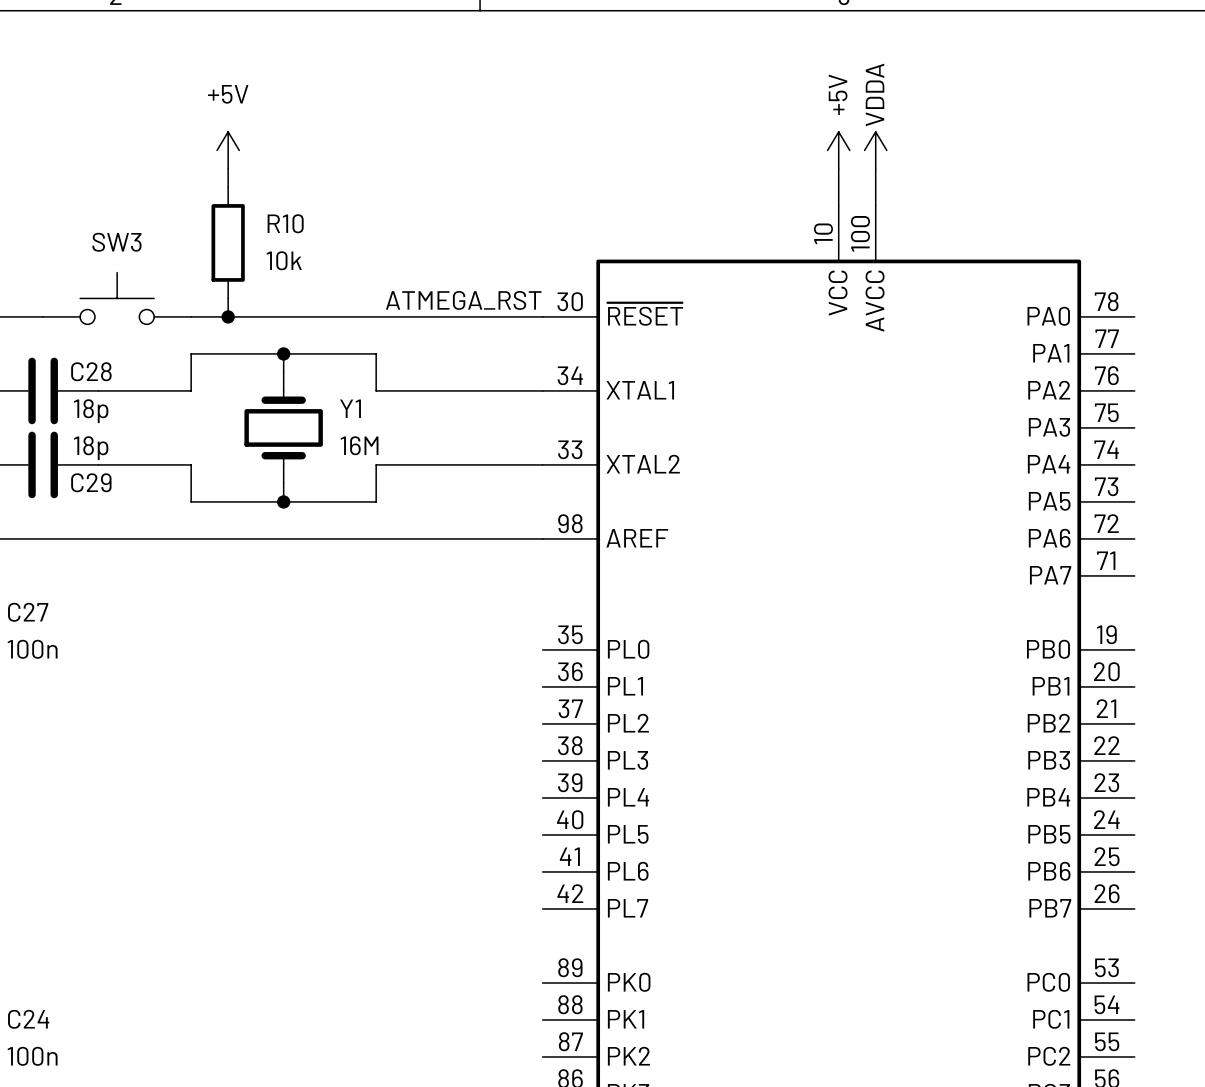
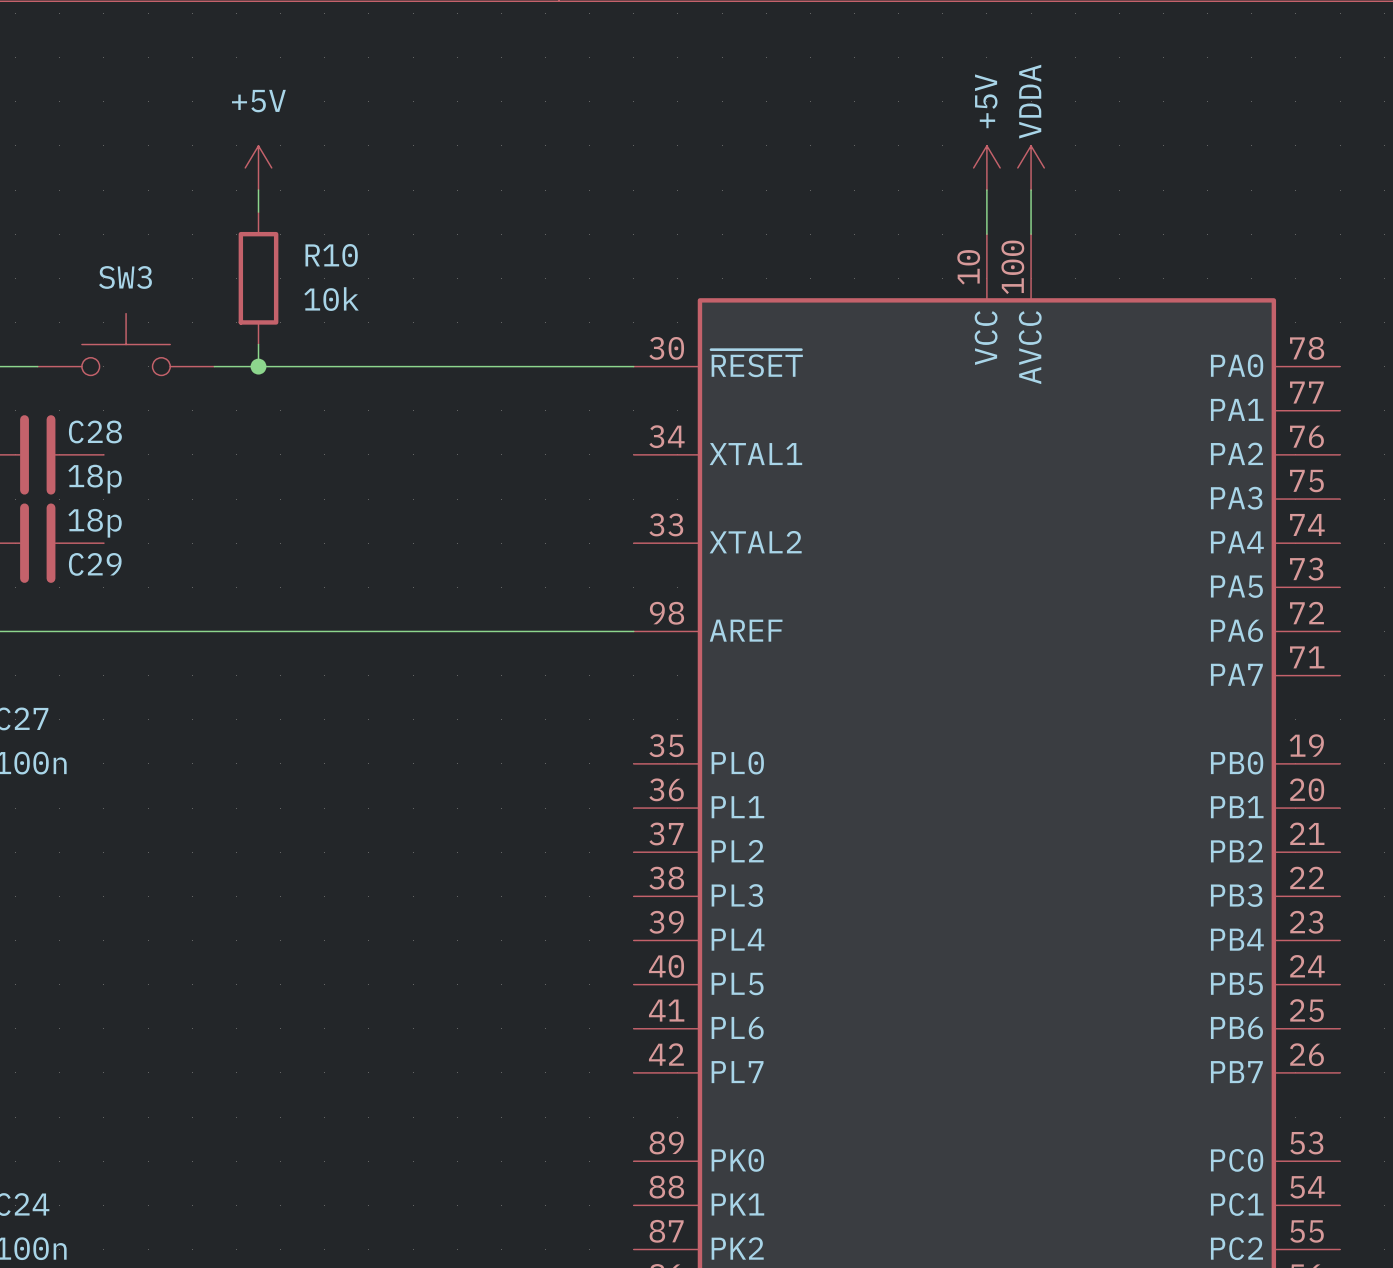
label: ATMEGA_RST (463, 300) -> none
wire: (283, 353) (283, 372) -> none
junction: (283, 353) -> none
wire: (98, 390) (191, 390) (191, 353) (376, 353) (376, 390) (542, 390) -> none
Y1: 16M (283, 427) -> none
wire: (98, 464) (191, 464) (191, 501) (376, 501) (376, 464) (542, 464) -> none
wire: (283, 483) (283, 501) -> none
junction: (283, 501) -> none

